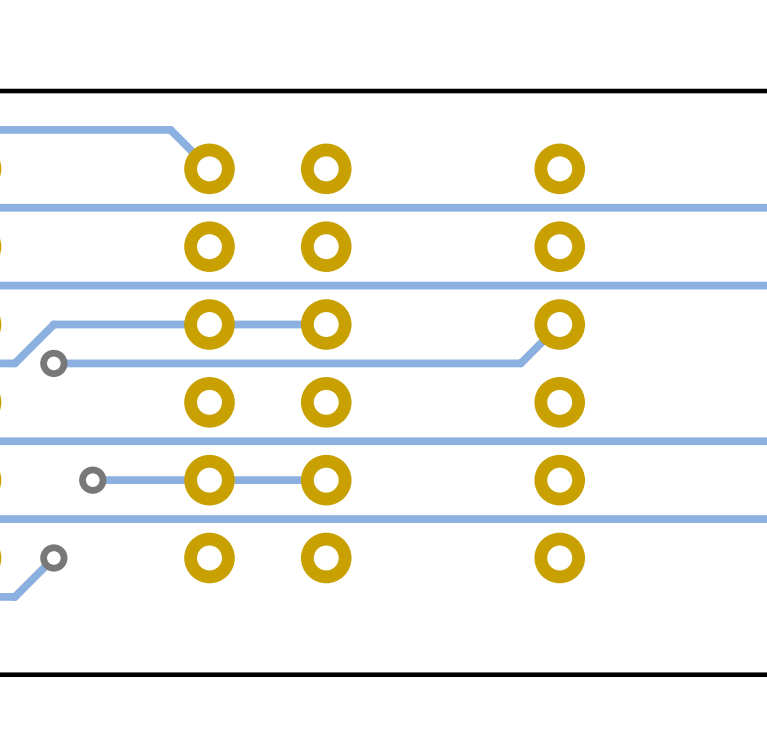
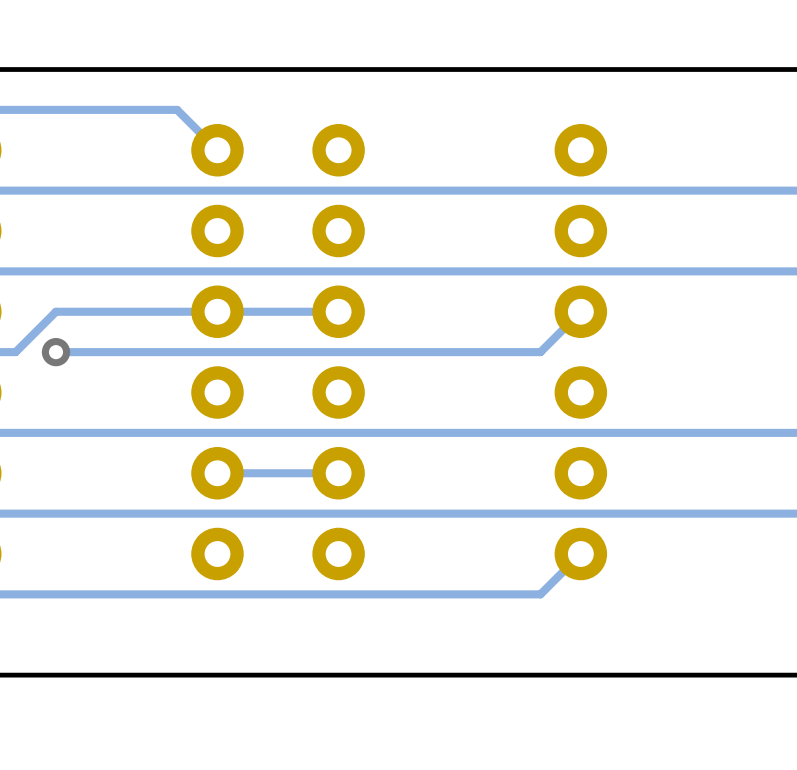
via: (92, 480) -> none
track: (209, 480) (92, 480) -> none
track: (53, 557) (14, 596) -> (580, 554) (540, 594) (15, 594)
via: (53, 557) -> none

